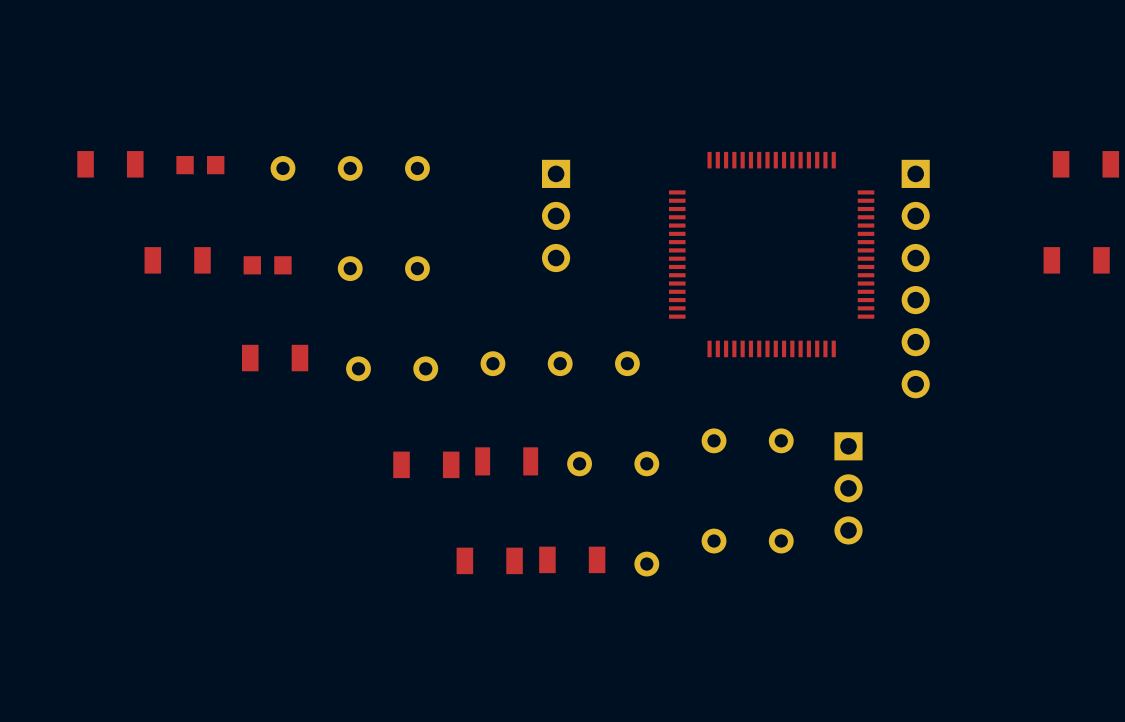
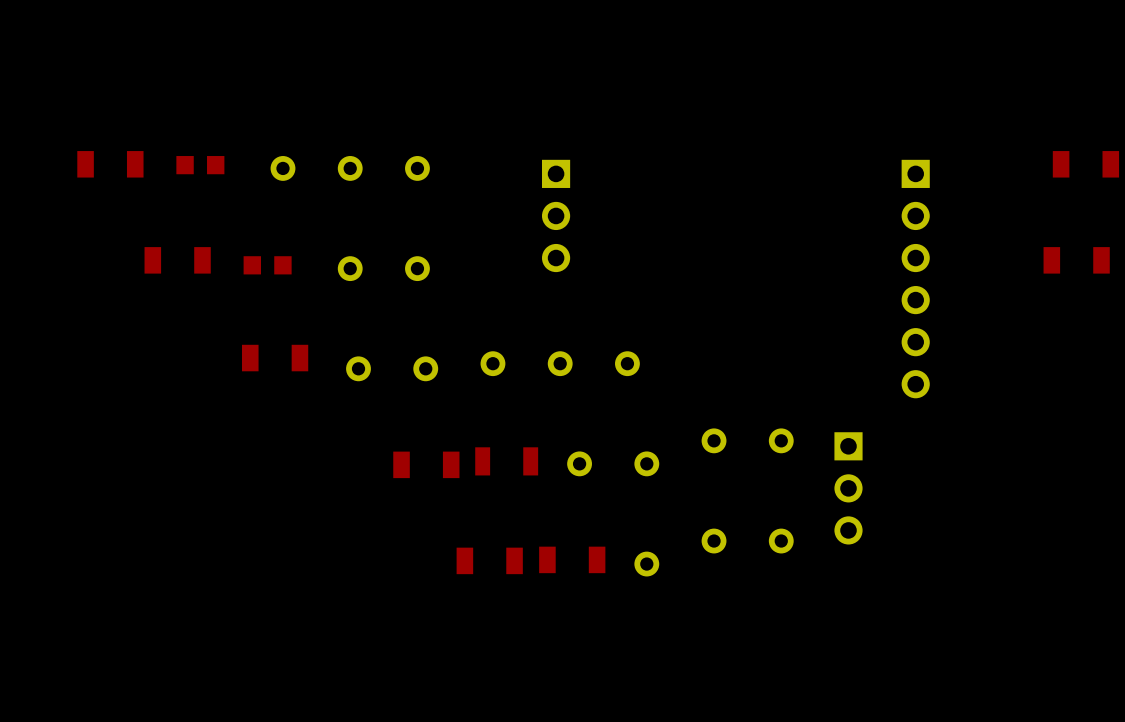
part: (771, 254) -> none

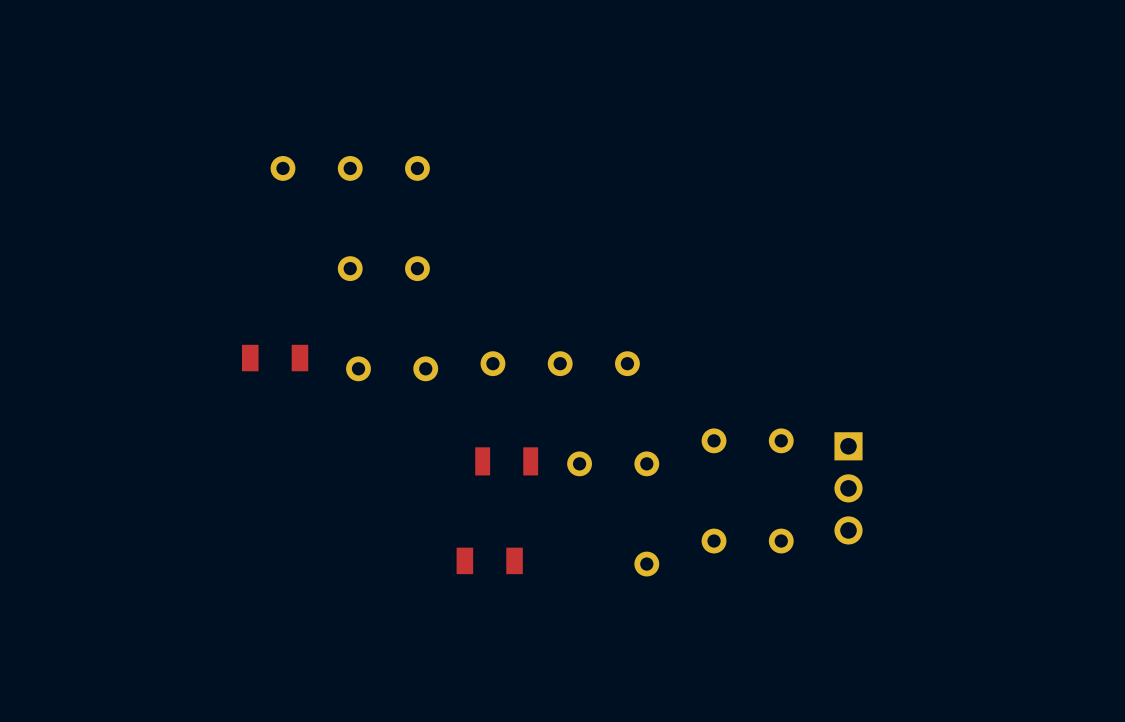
part: (110, 164) -> none
part: (1085, 164) -> none
part: (200, 165) -> none
part: (556, 215) -> none
part: (177, 260) -> none
part: (1076, 260) -> none
part: (267, 265) -> none
part: (915, 279) -> none
part: (426, 464) -> none
part: (572, 559) -> none

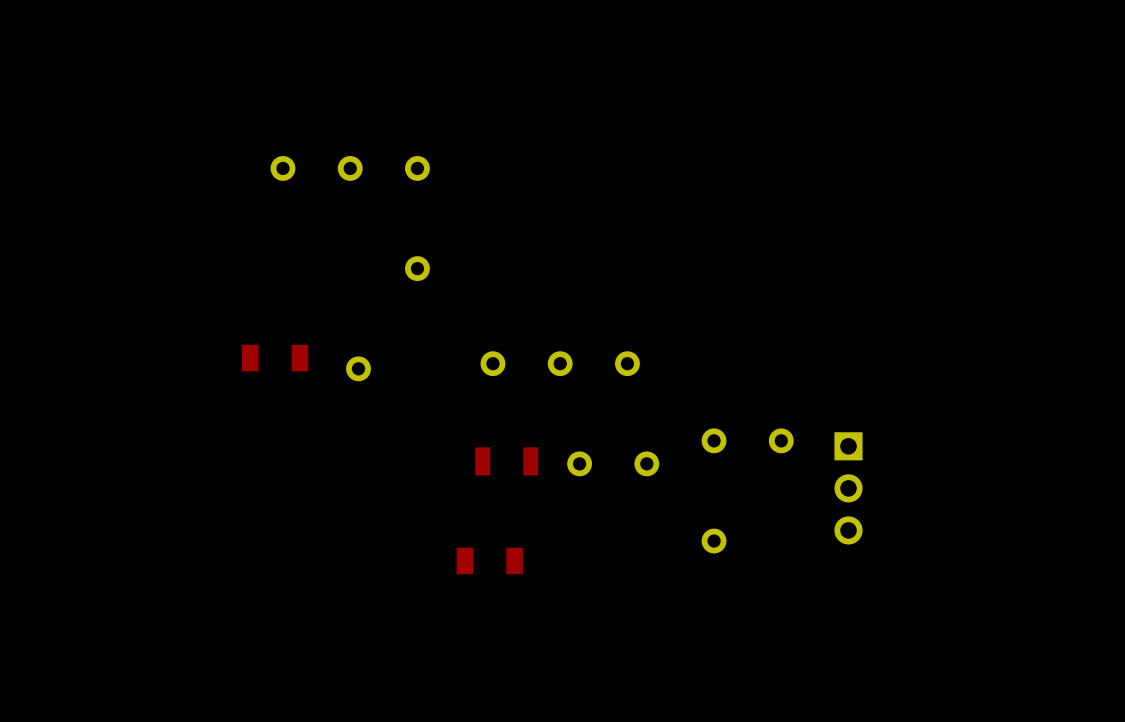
part: (350, 268) -> none
part: (425, 368) -> none
part: (781, 541) -> none
part: (646, 564) -> none

